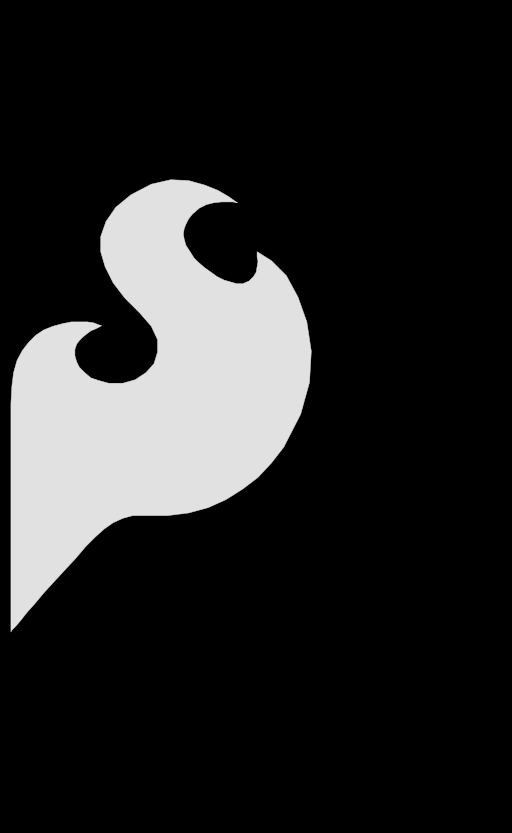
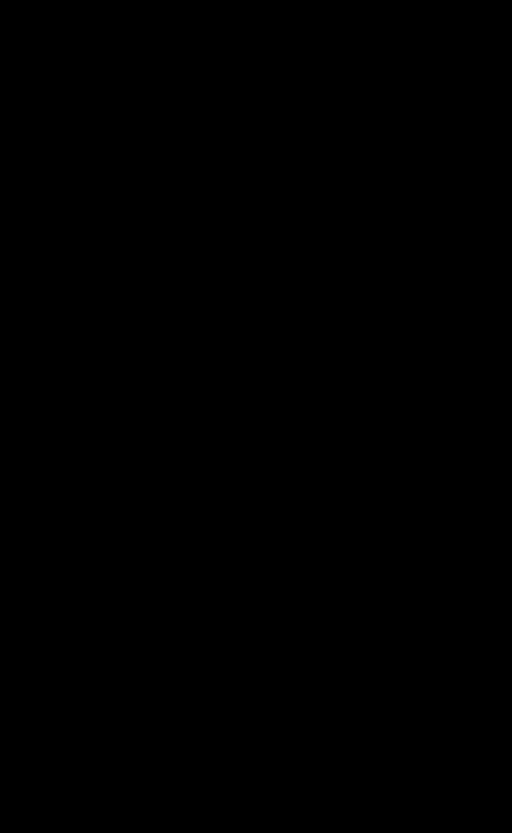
drawing: [10, 179, 312, 633] -> none

